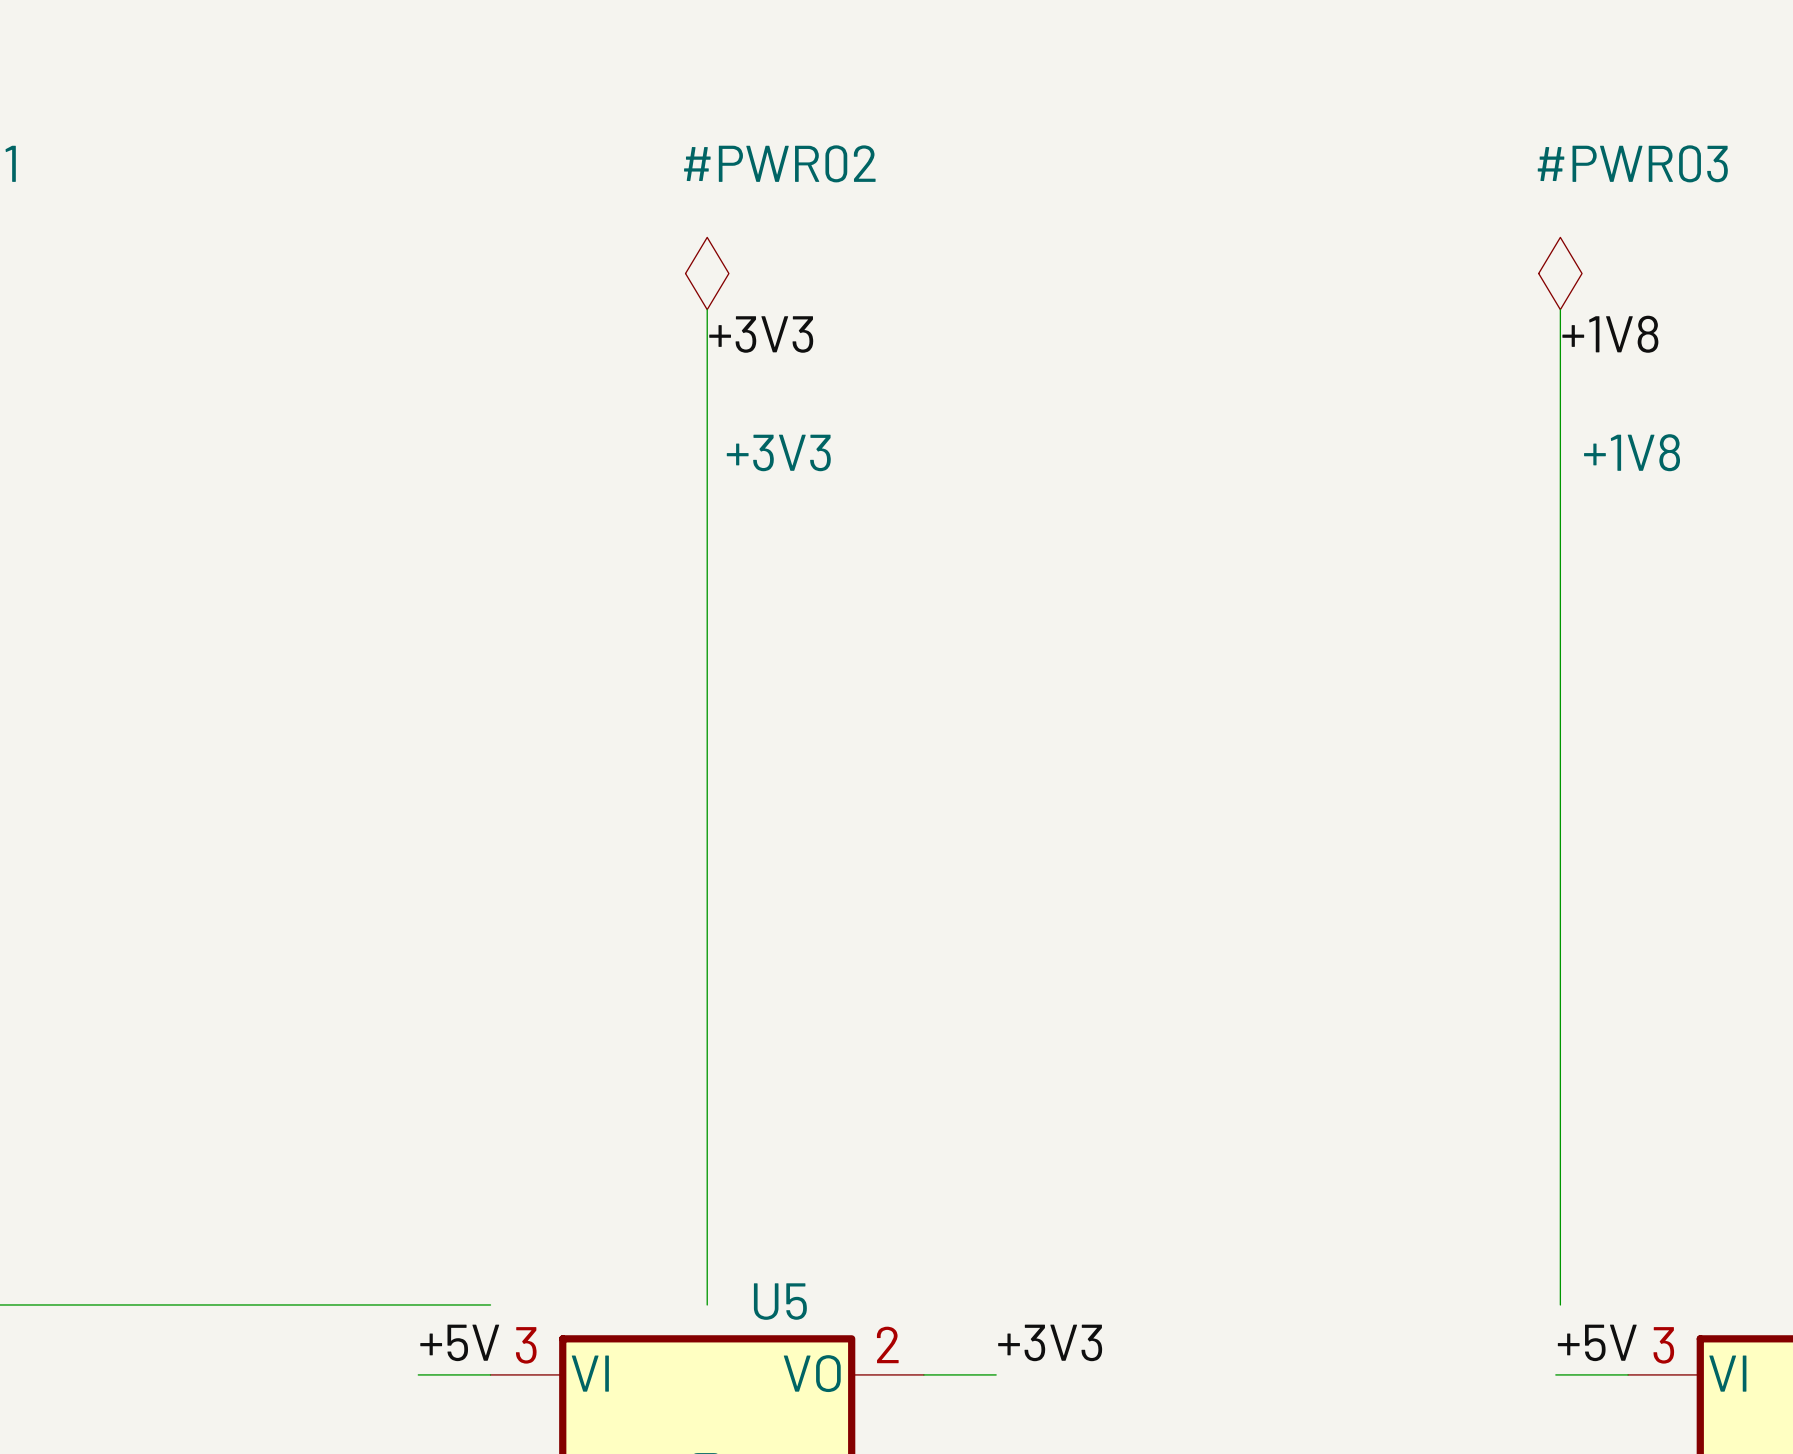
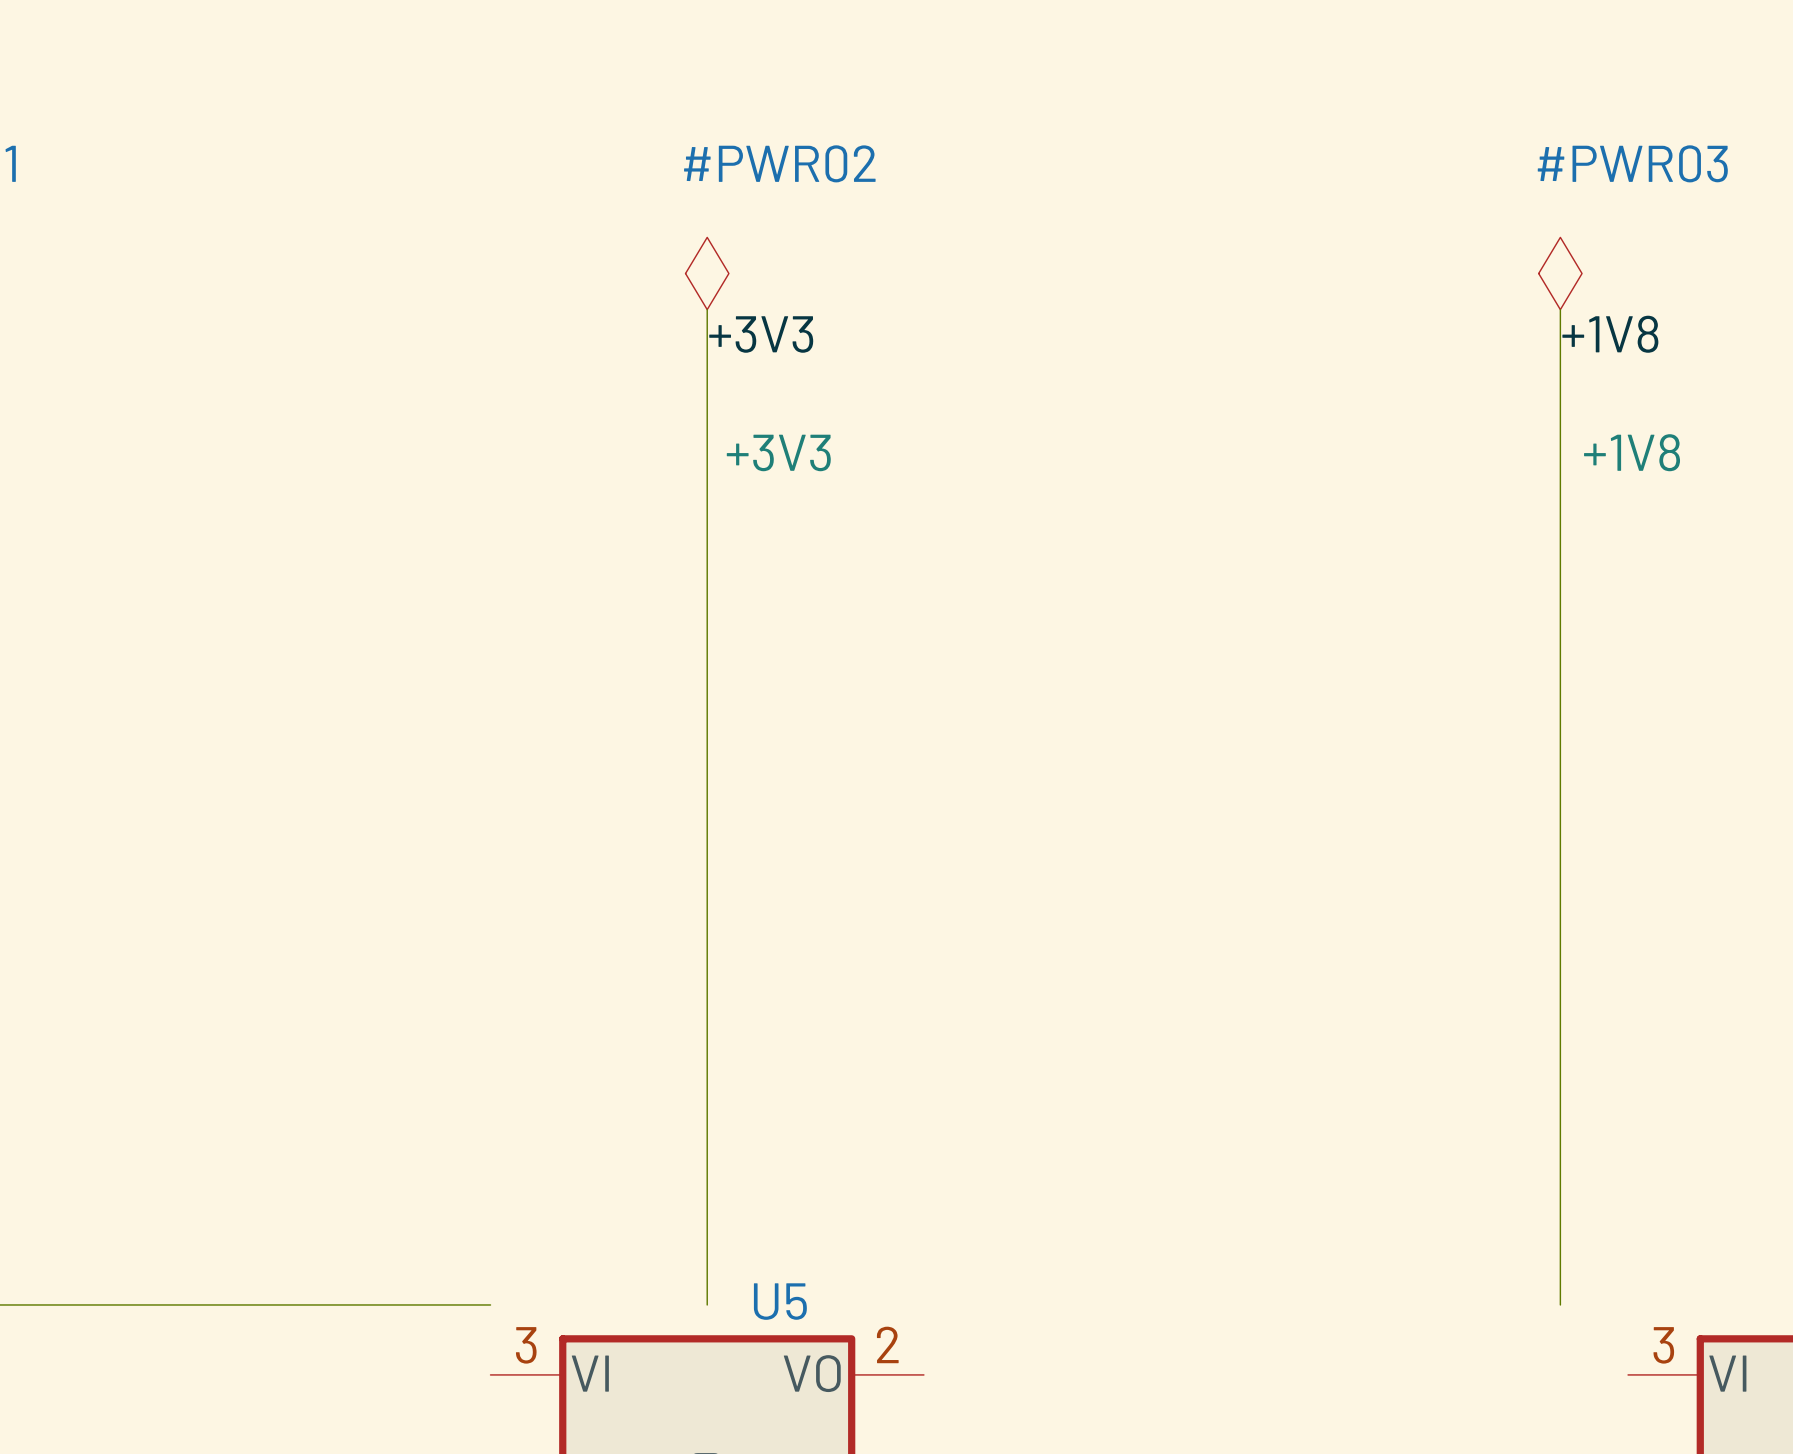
label: +5V (459, 1342) -> none
label: +3V3 (1050, 1342) -> none
label: +5V (1597, 1342) -> none
wire: (418, 1374) (490, 1374) -> none
wire: (923, 1374) (996, 1374) -> none
wire: (1555, 1374) (1628, 1374) -> none

